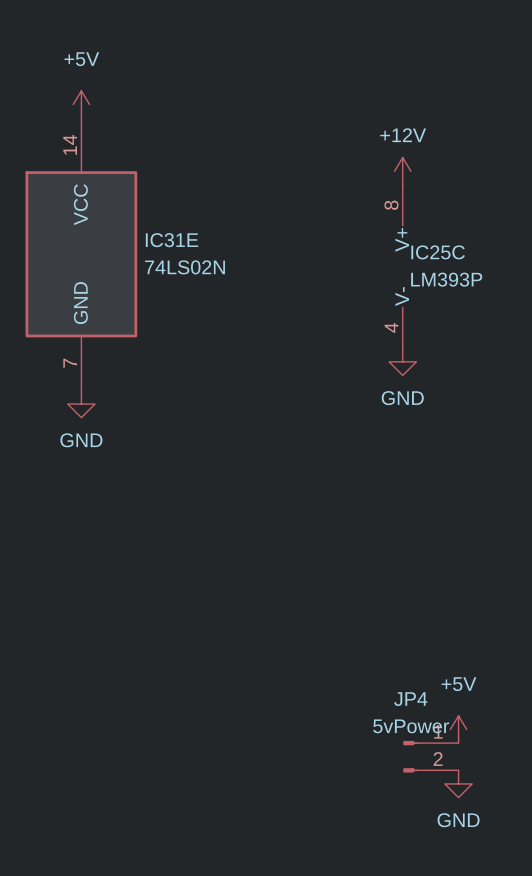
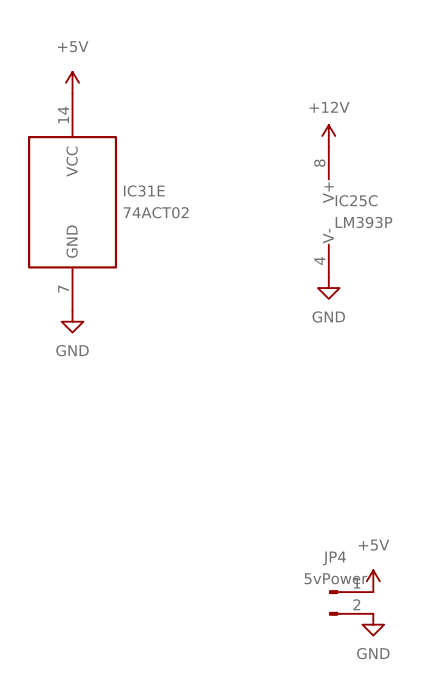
IC31E value: 74LS02N (184, 267) -> 74ACT02 (156, 212)

